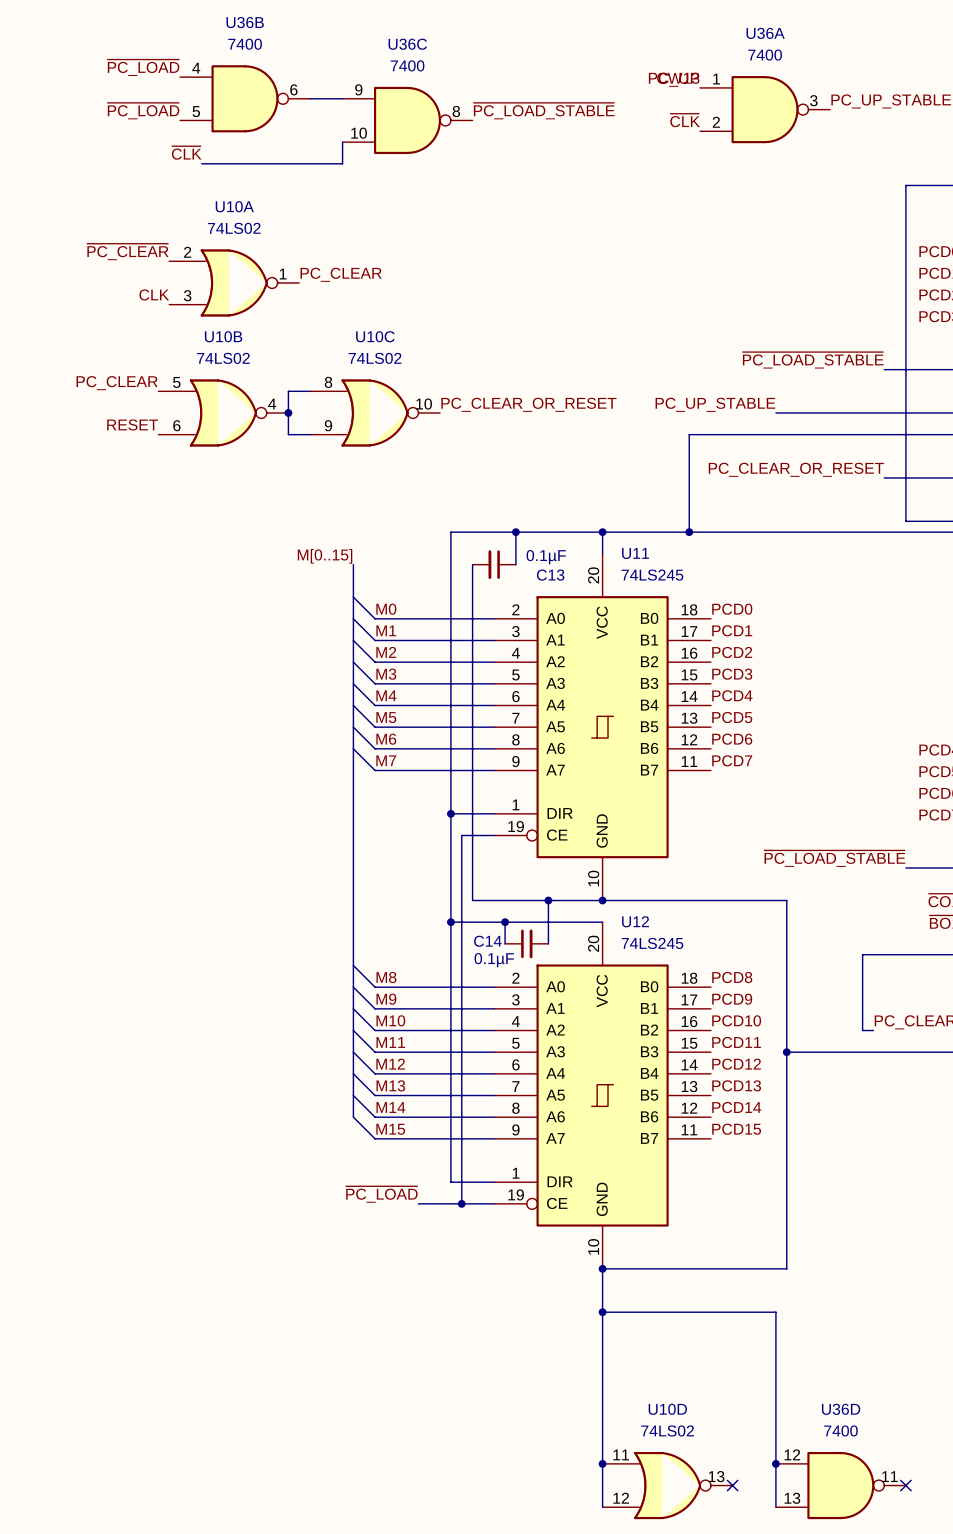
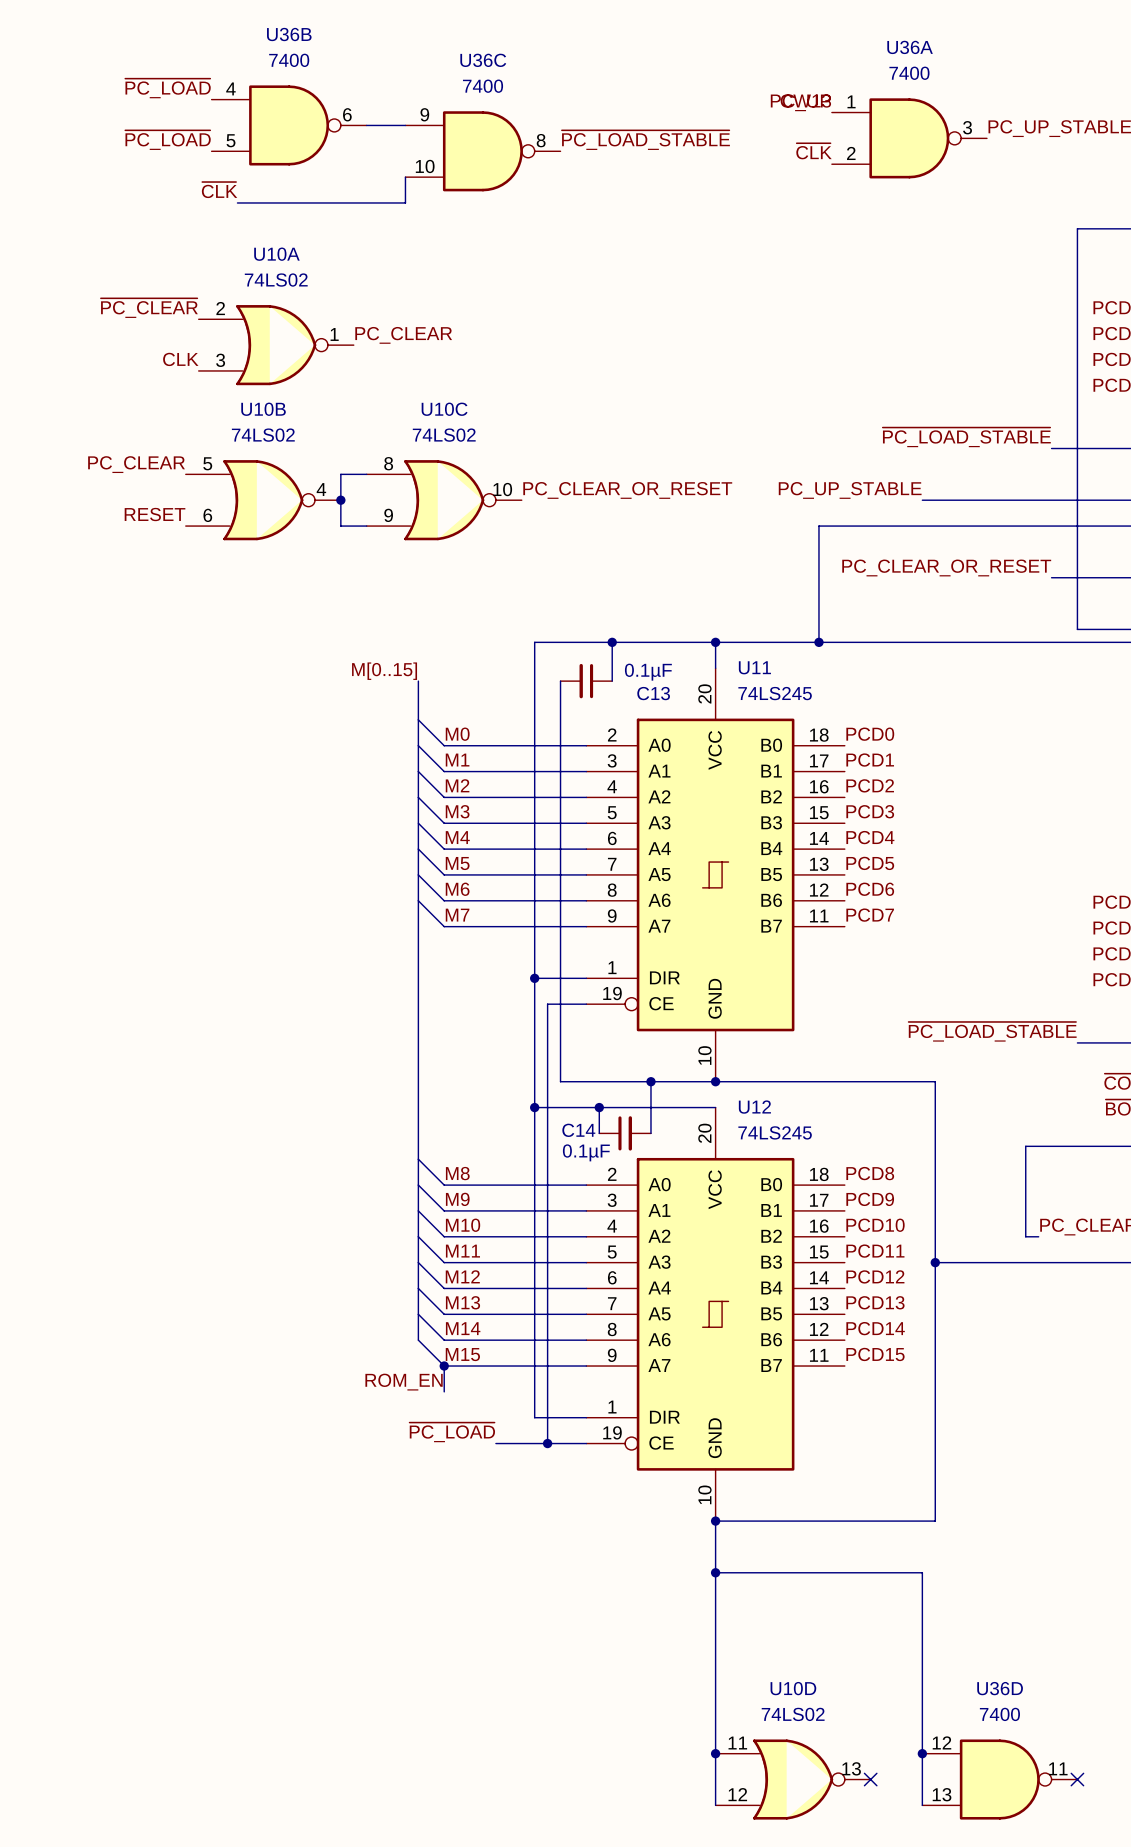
wire: none -> (444, 1366) (444, 1391)
junction: none -> (444, 1366)
label: none -> ROM_EN (404, 1382)

